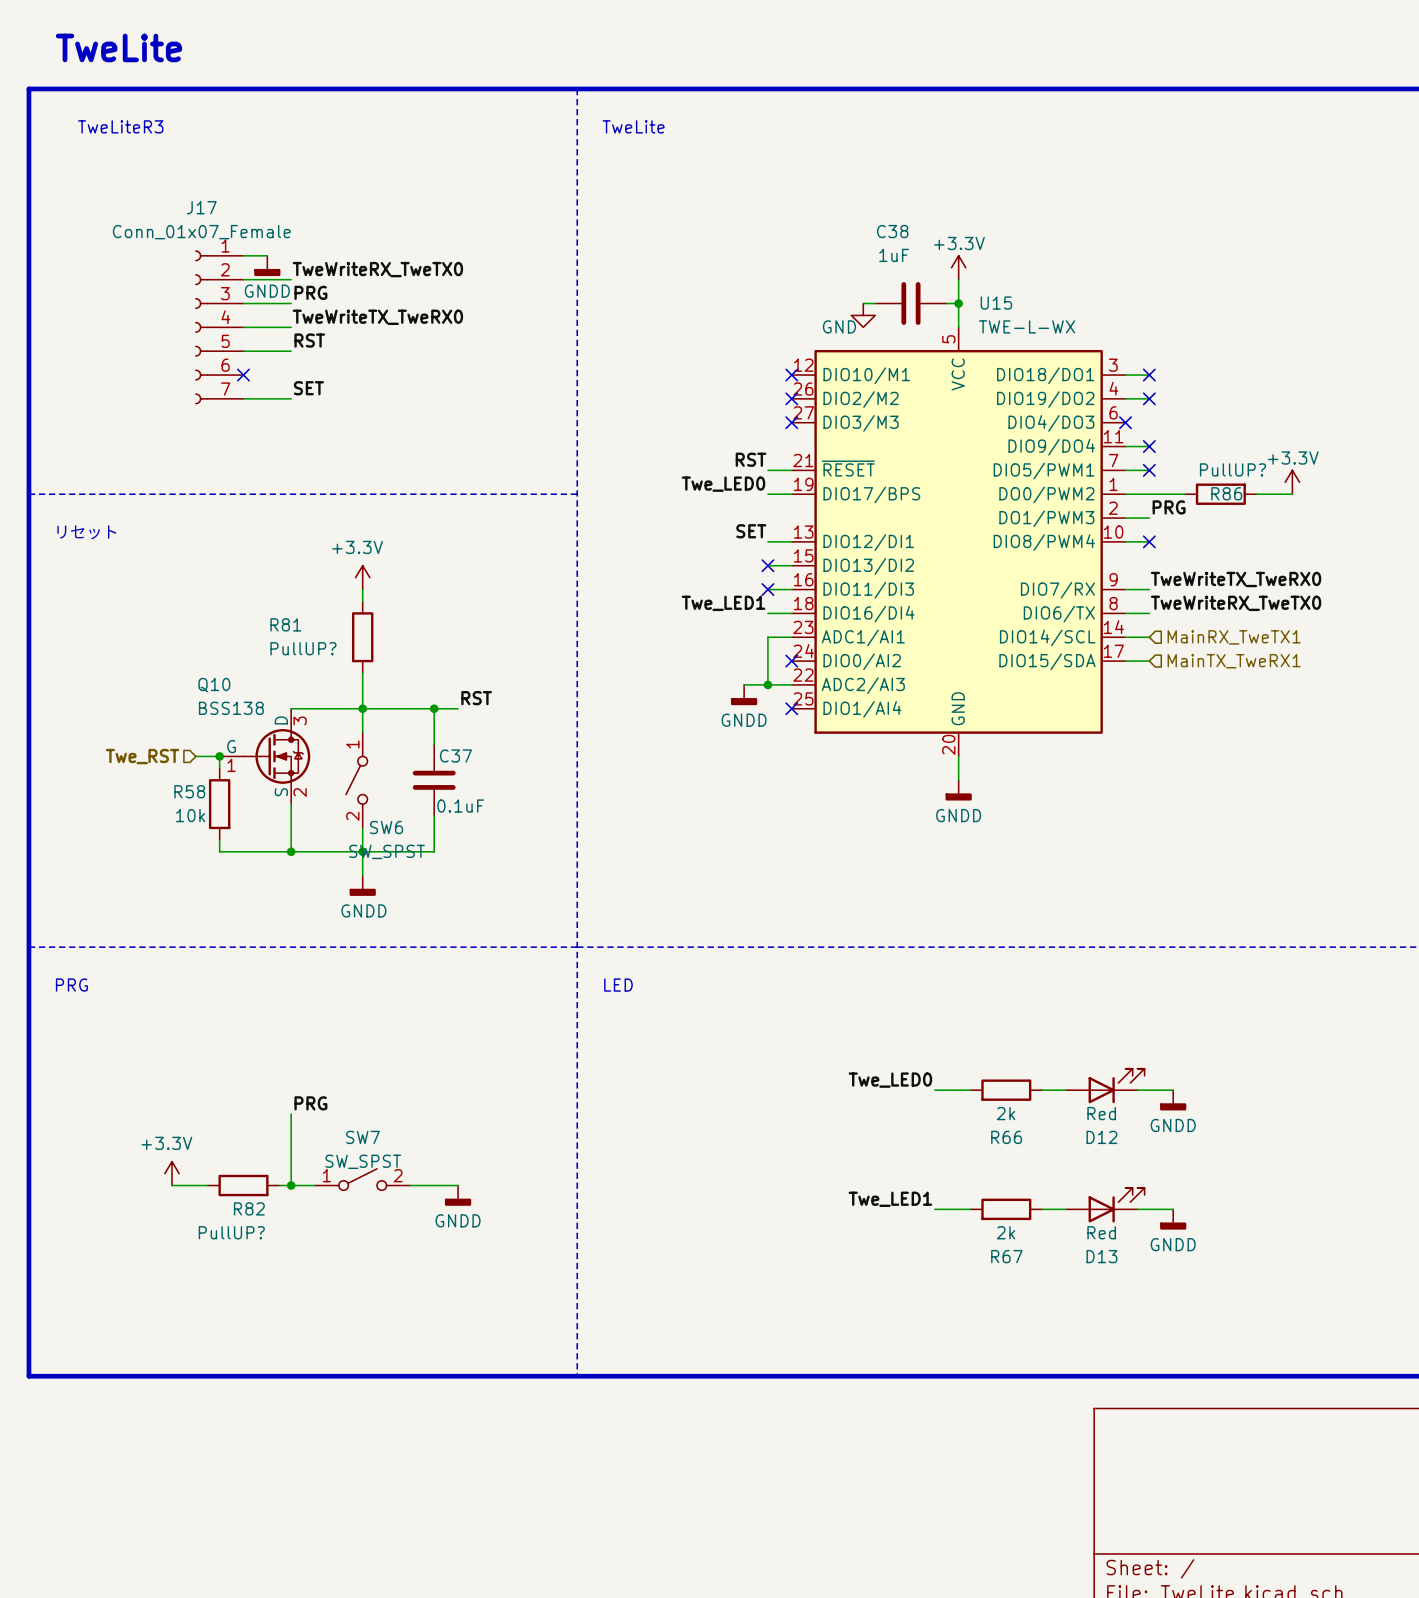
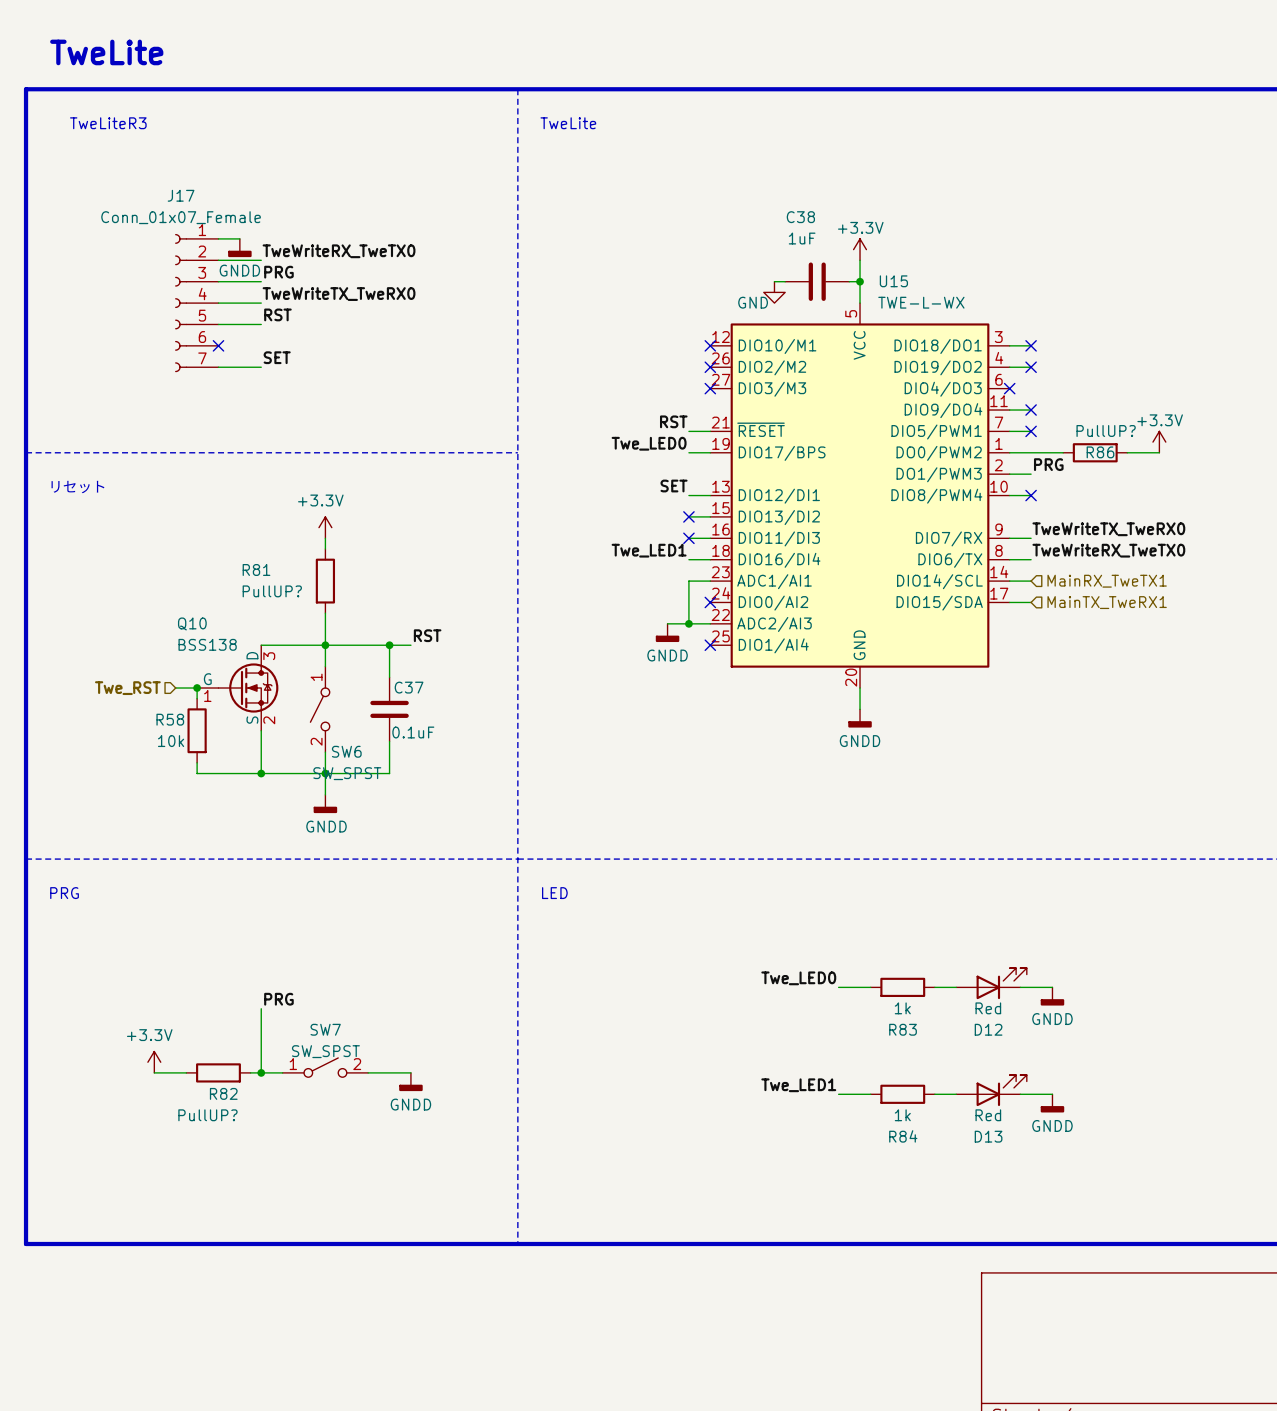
R66 value: 2k (1006, 1113) -> 1k (902, 1008)
R66 name: R66 (1006, 1137) -> R83 (903, 1029)
R67 value: 2k (1006, 1232) -> 1k (902, 1115)
R67 name: R67 (1006, 1256) -> R84 (903, 1136)

